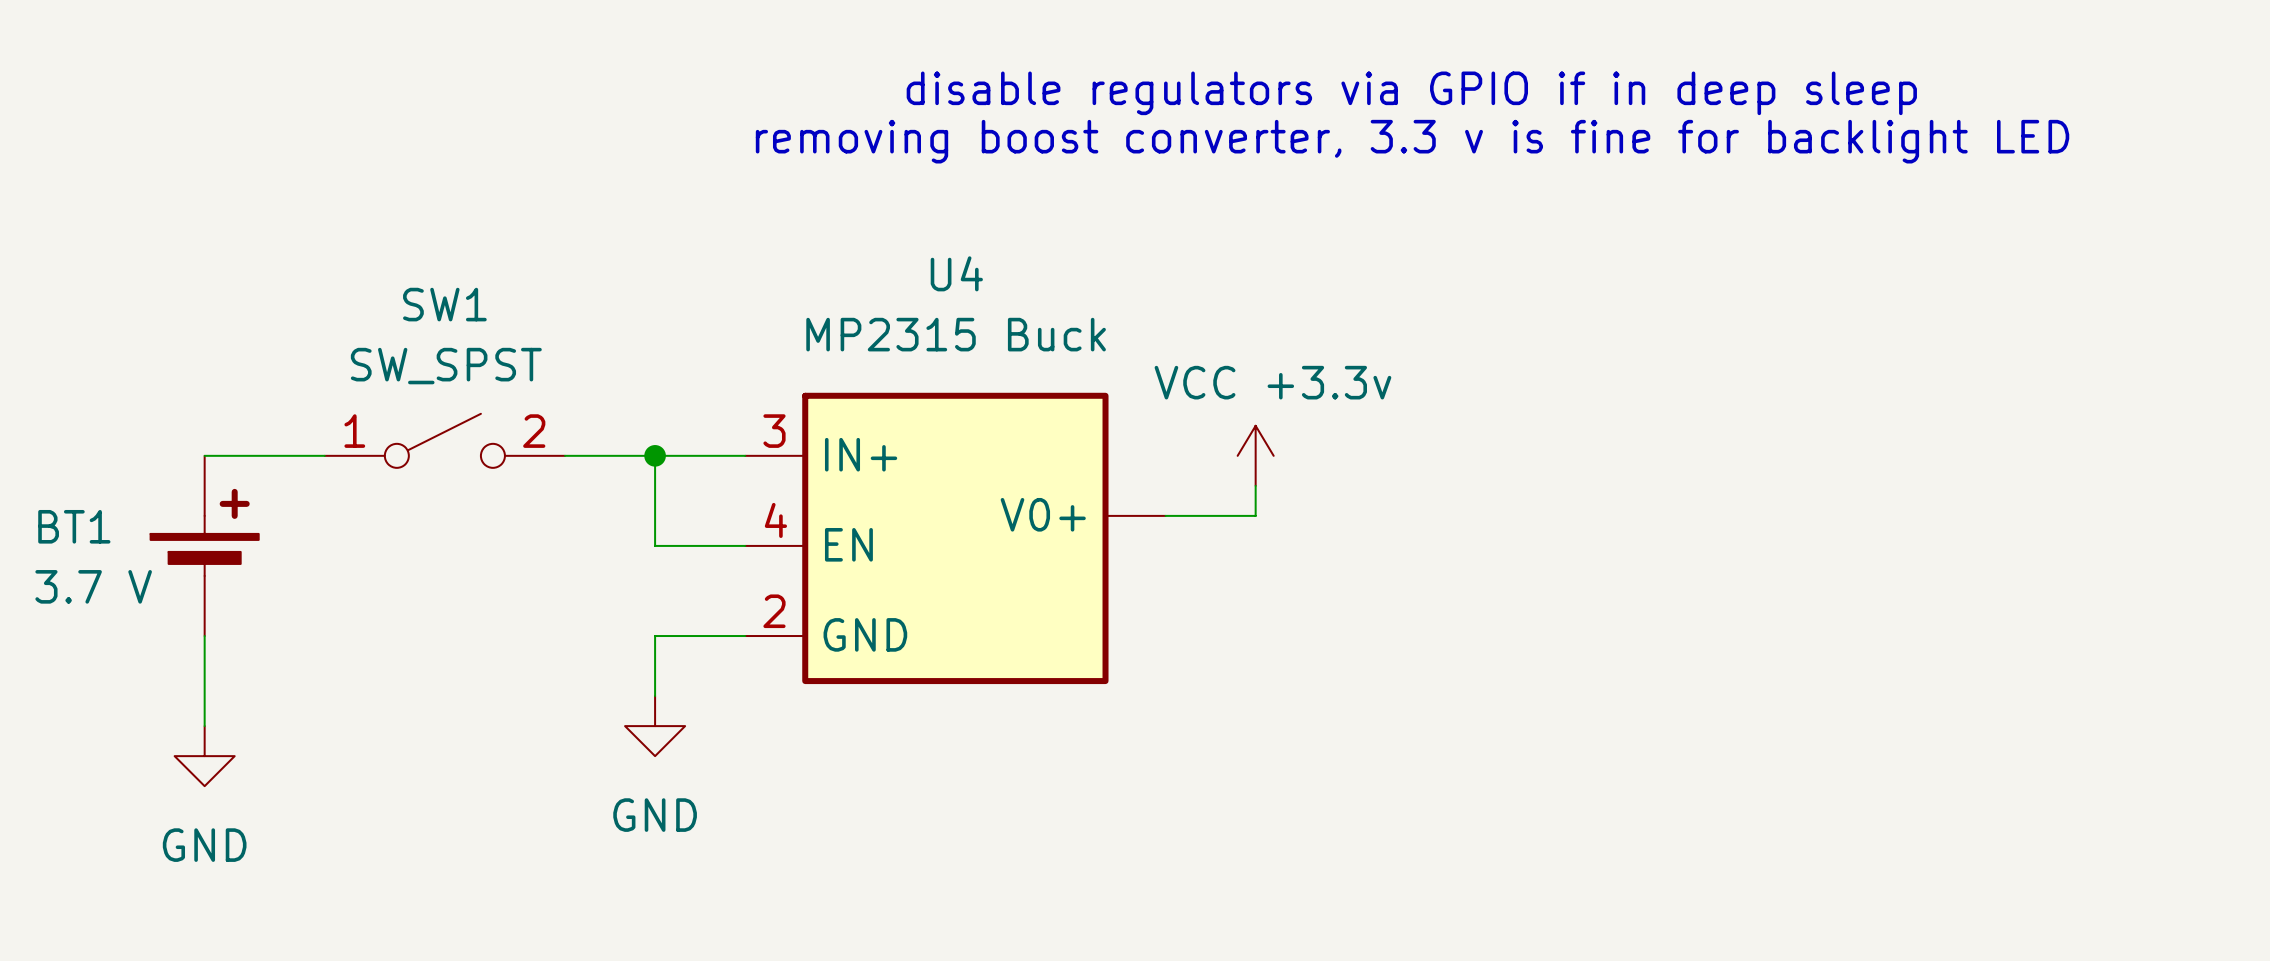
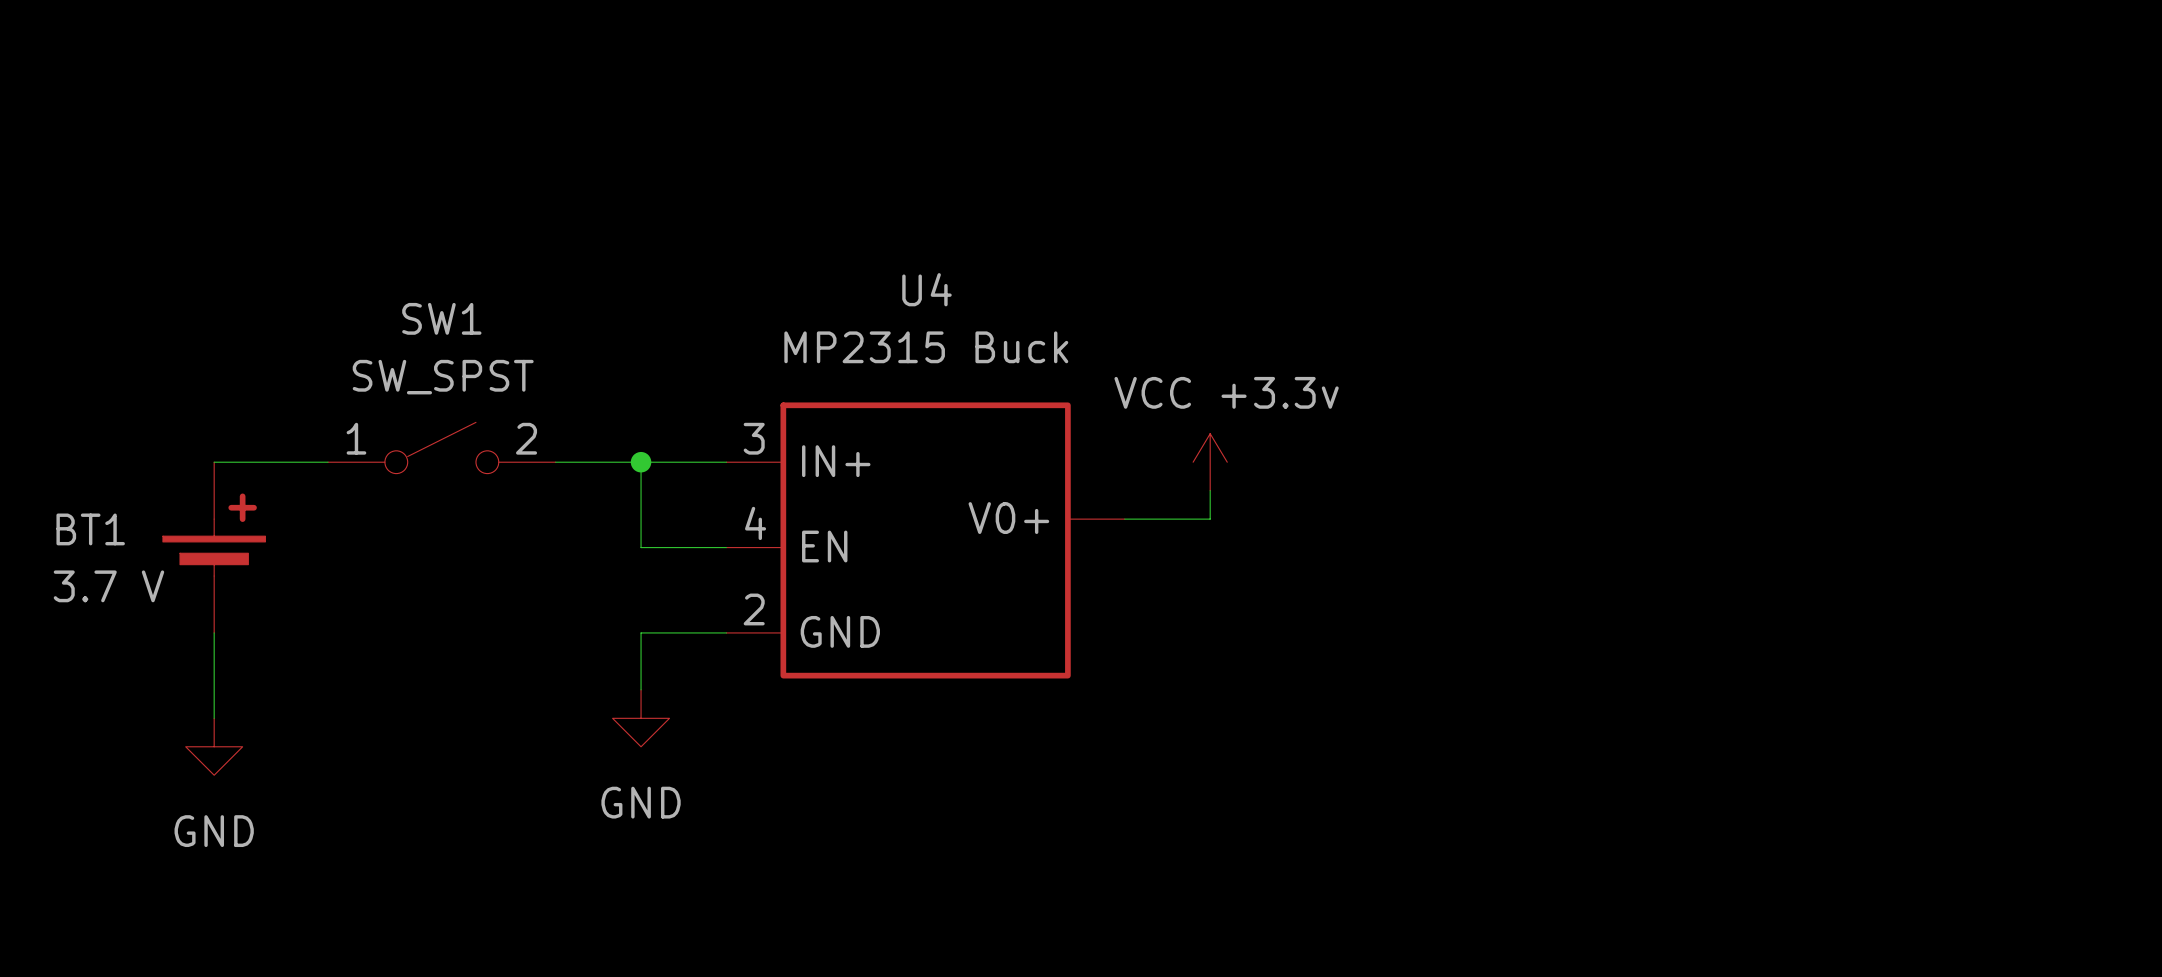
text: disable regulators via GPIO if in deep sleep (1411, 93) -> none
text: removing boost converter, 3.3 v is fine for backlight LED (1412, 141) -> none

